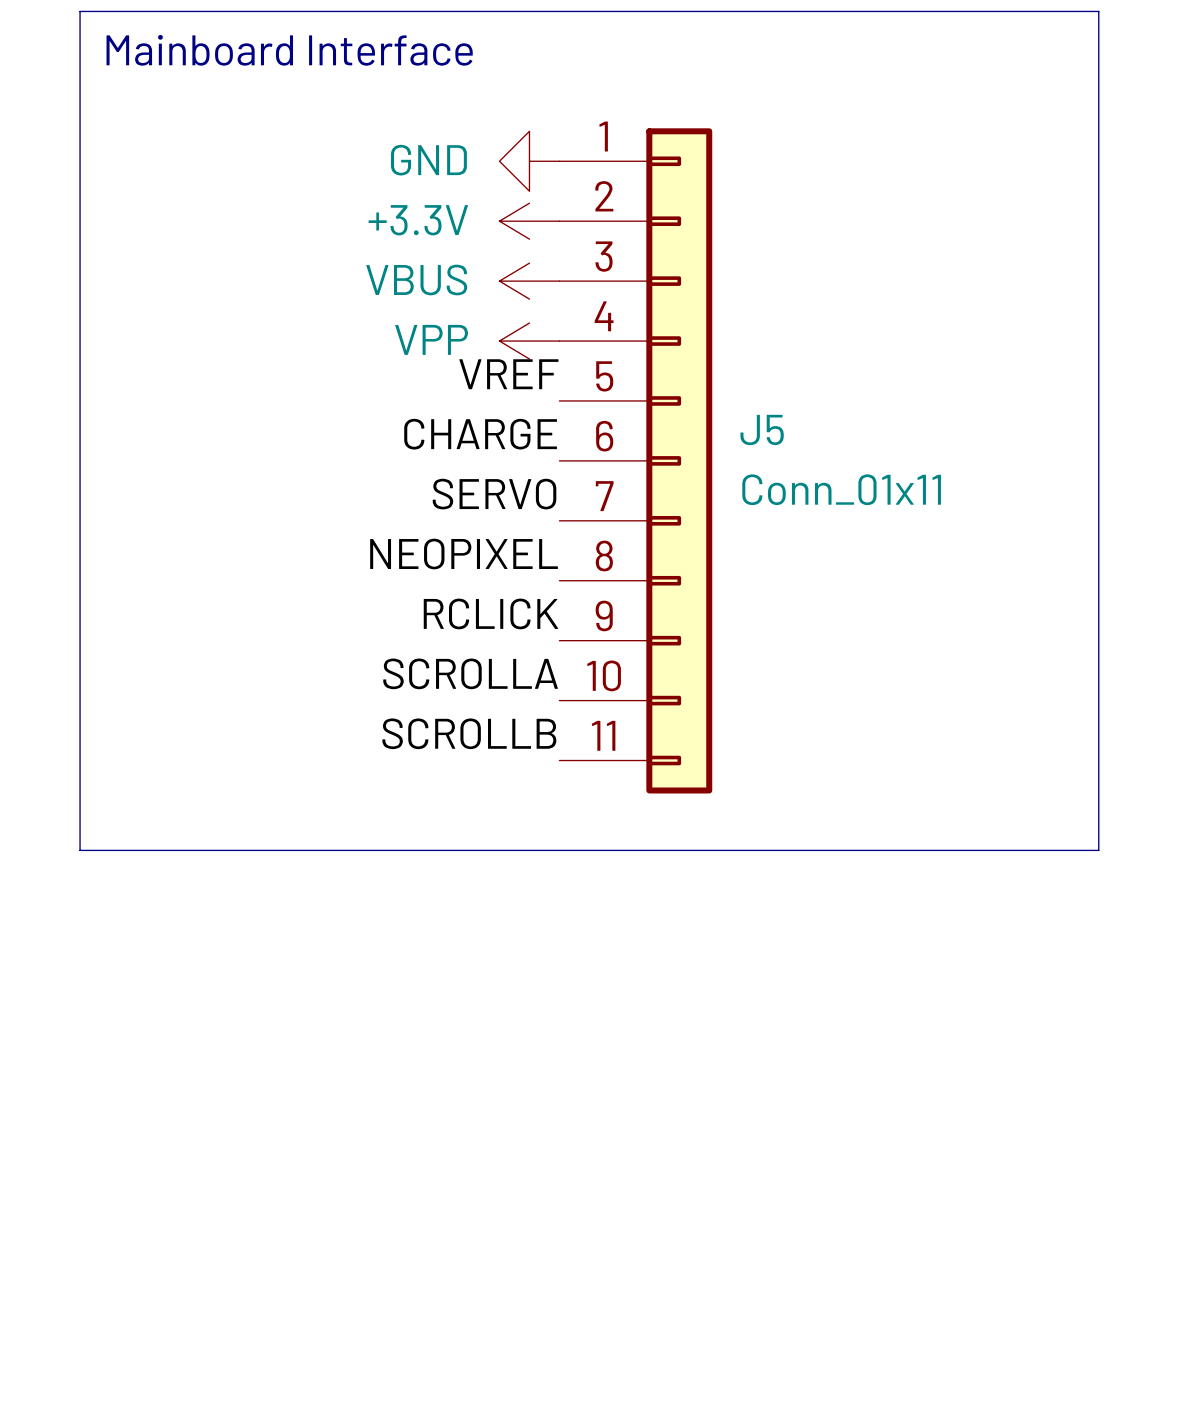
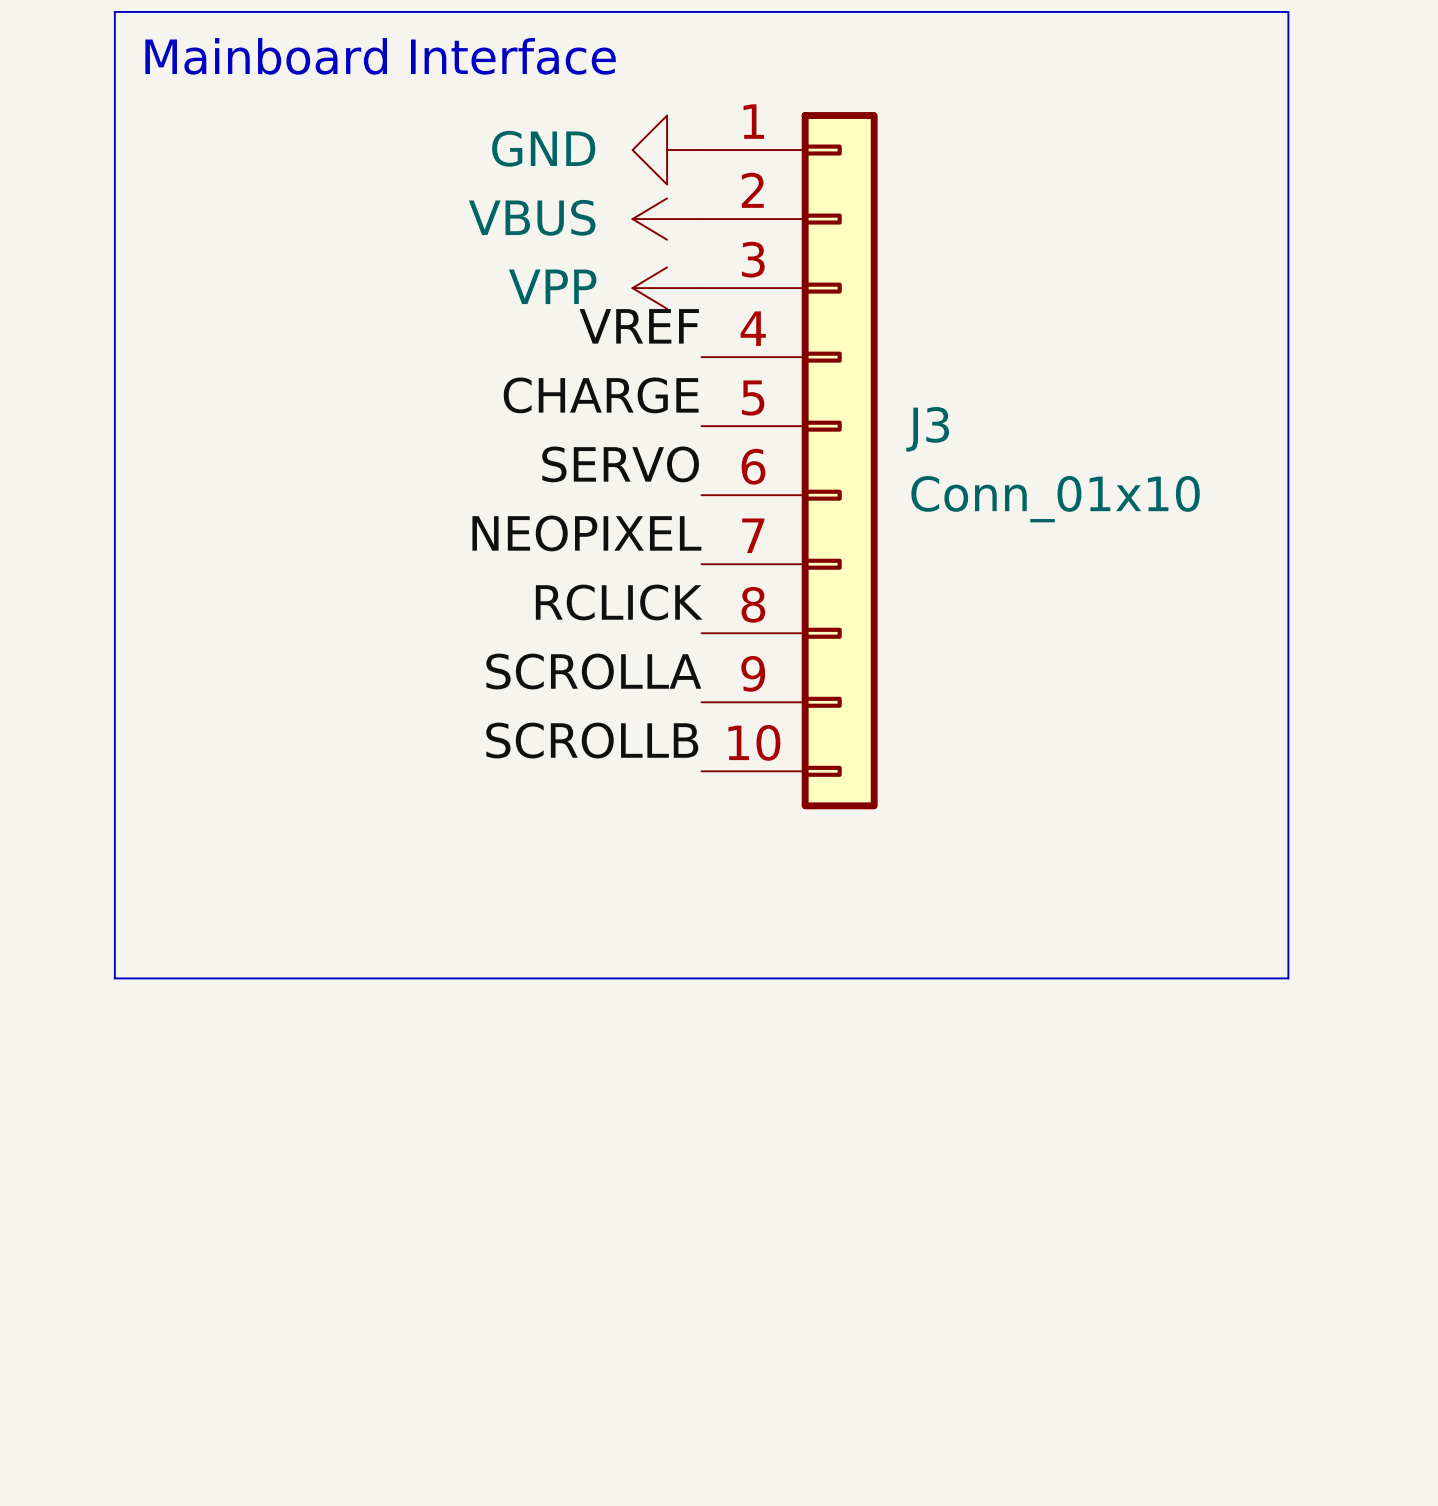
power symbol position: GND (529, 161) -> GND (667, 150)
power symbol: +3.3V (529, 221) -> none
power symbol position: VBUS (529, 281) -> VBUS (667, 219)
power symbol position: VPP (529, 341) -> VPP (667, 288)
label position: VREF (508, 374) -> VREF (639, 326)
J3: none -> Conn_01x10 (789, 460)
label position: CHARGE (480, 434) -> CHARGE (601, 395)
J5: Conn_01x11 (635, 460) -> none
label position: SERVO (494, 494) -> SERVO (620, 464)
label position: NEOPIXEL (464, 554) -> NEOPIXEL (586, 533)
label position: RCLICK (491, 613) -> RCLICK (619, 602)
label position: SCROLLA (470, 673) -> SCROLLA (593, 671)
label position: SCROLLB (469, 733) -> SCROLLB (592, 740)

